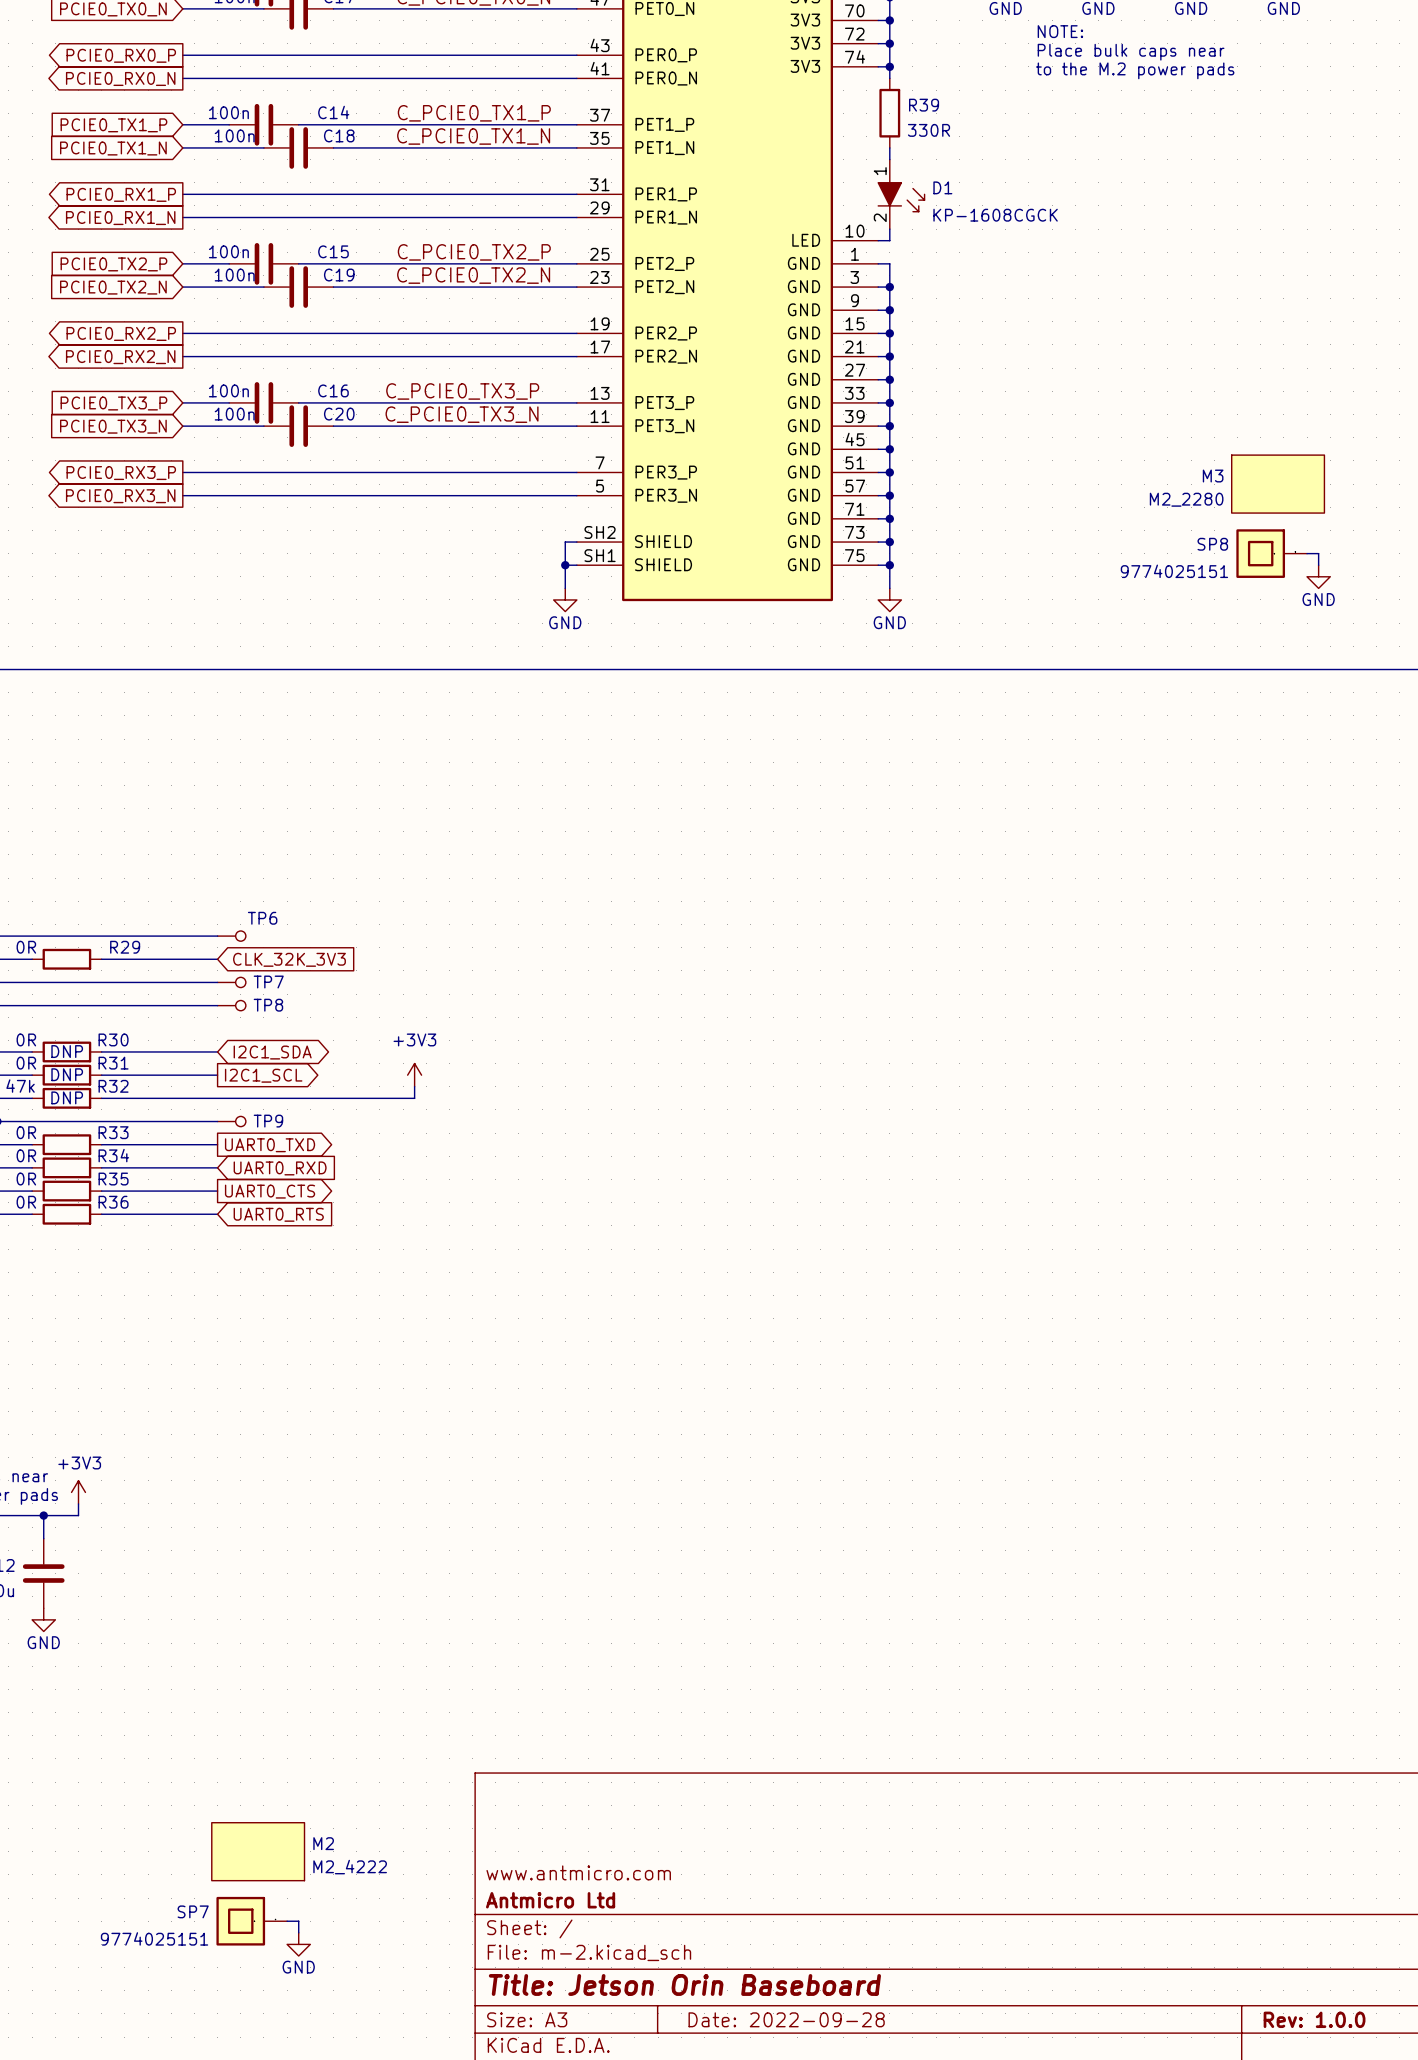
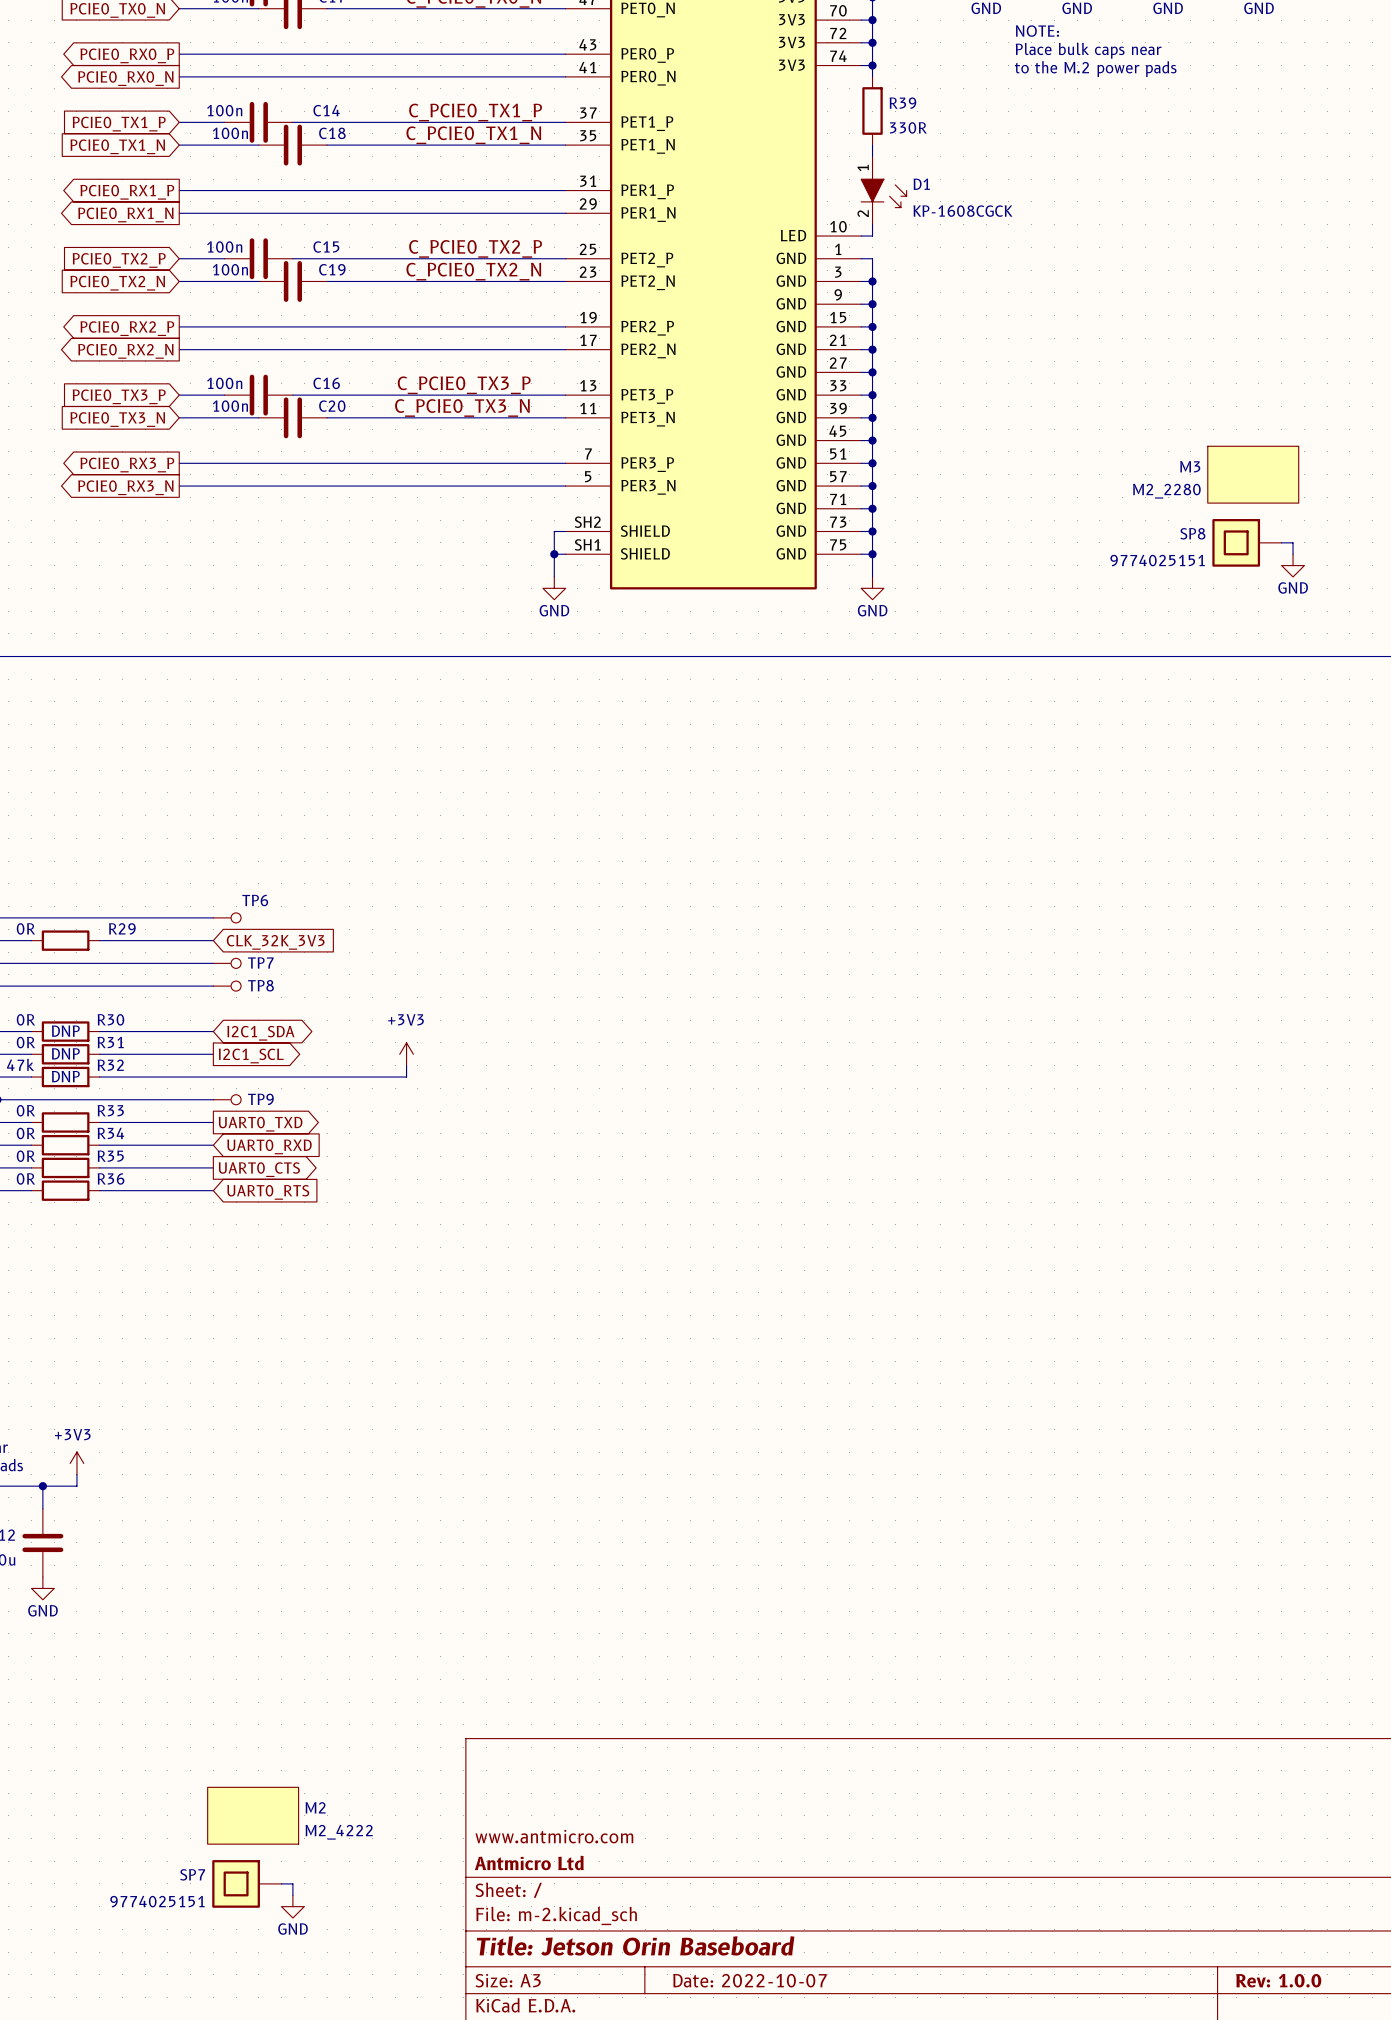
title block: Date: 2022-09-28 (786, 2019) -> Date: 2022-10-07 (749, 1980)

